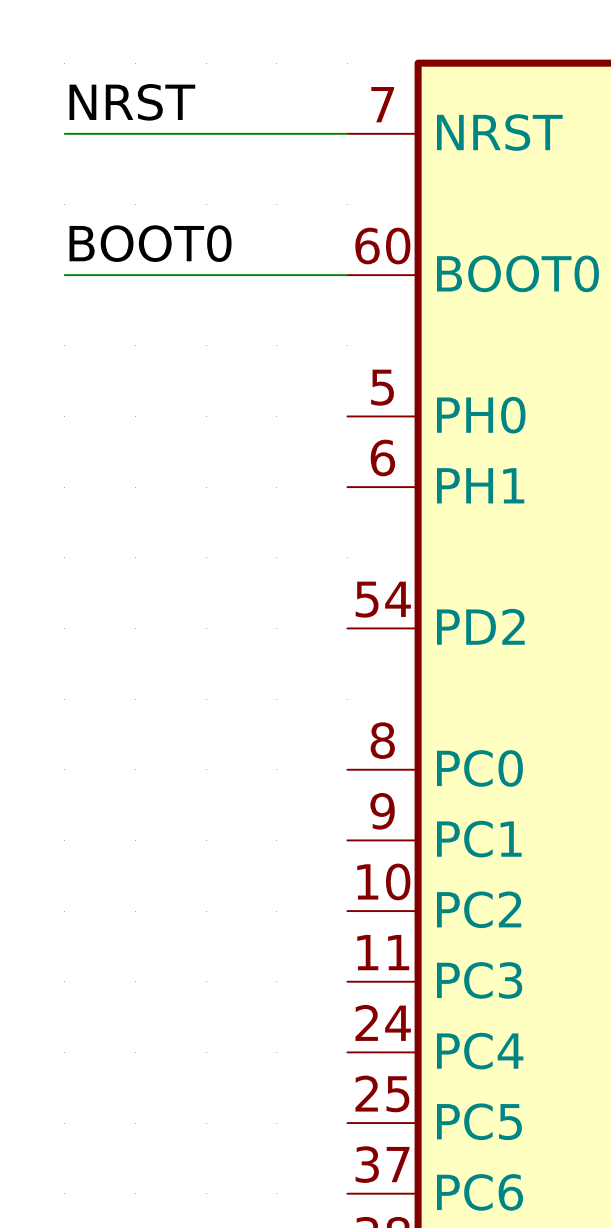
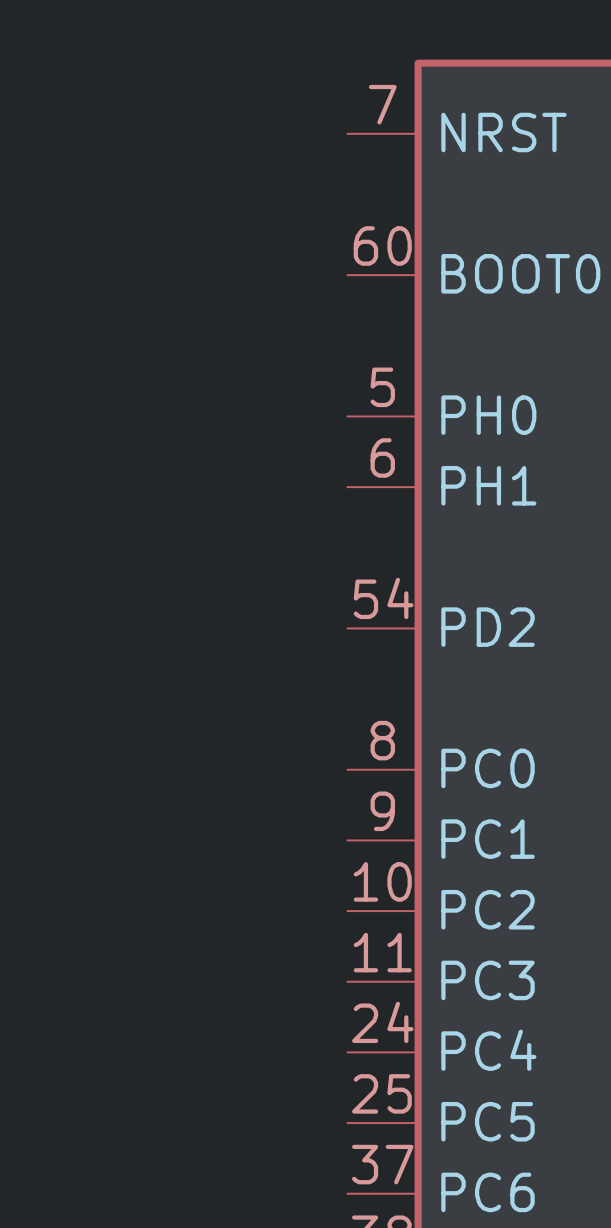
label: NRST (132, 102) -> none
wire: (64, 133) (347, 133) -> none
label: BOOT0 (150, 243) -> none
wire: (64, 275) (347, 275) -> none

